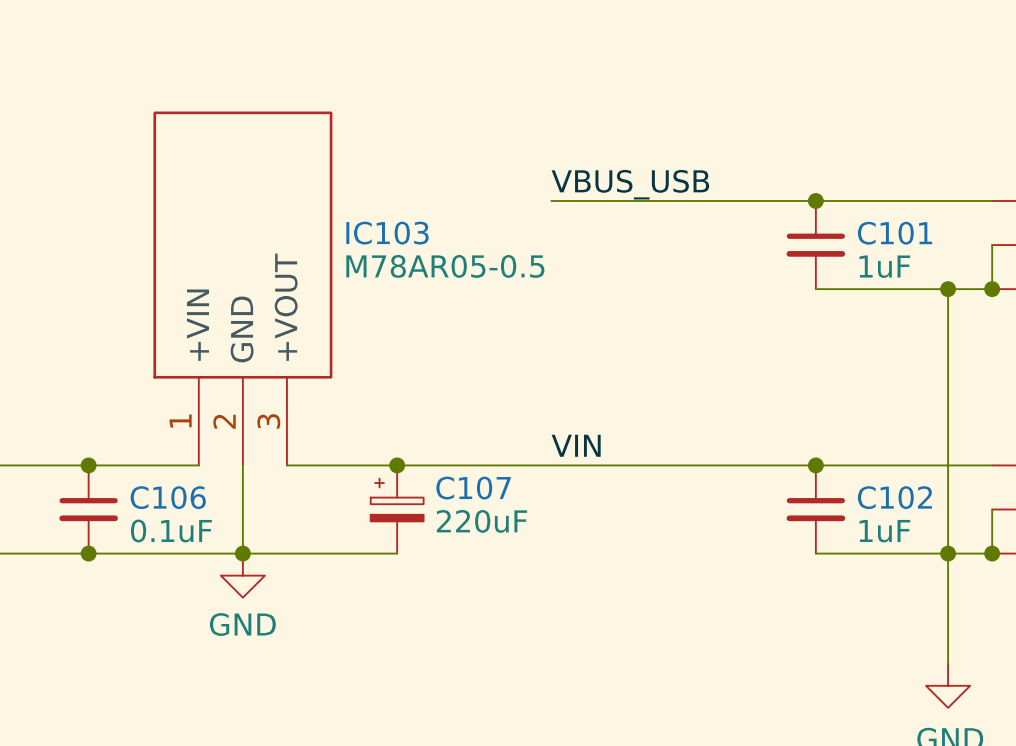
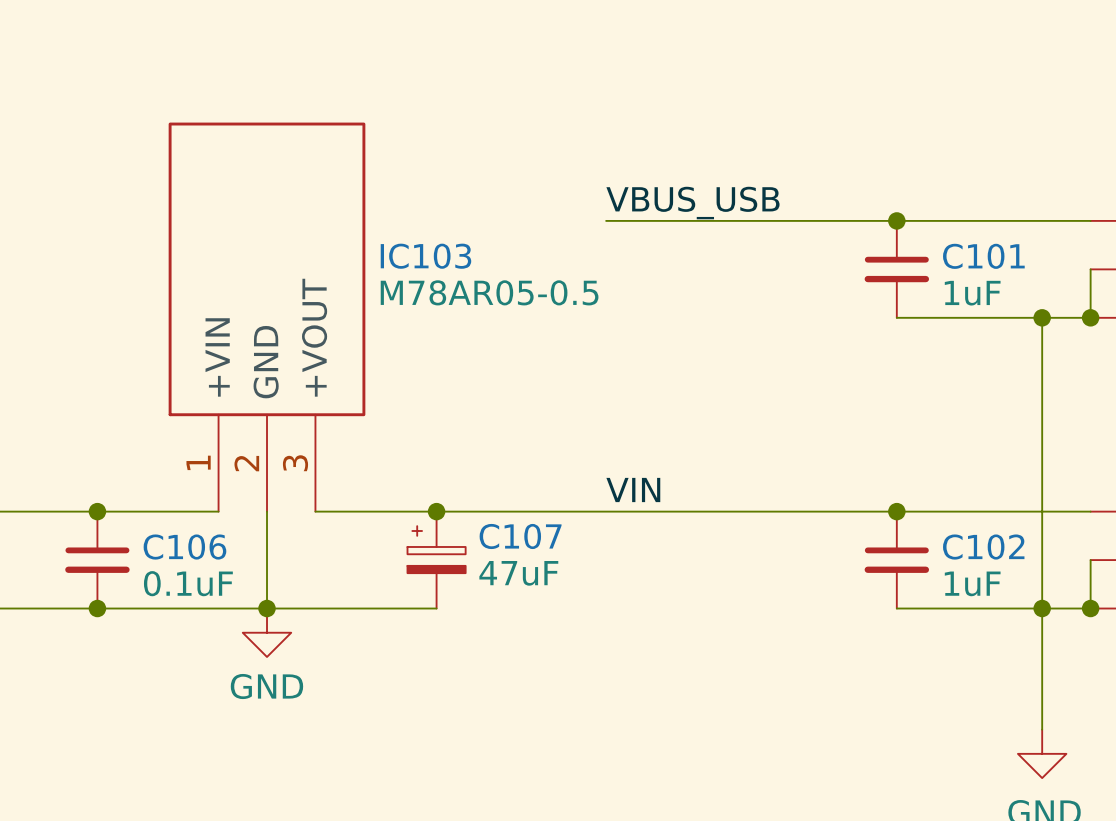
C107 value: 220uF (481, 521) -> 47uF (518, 573)

